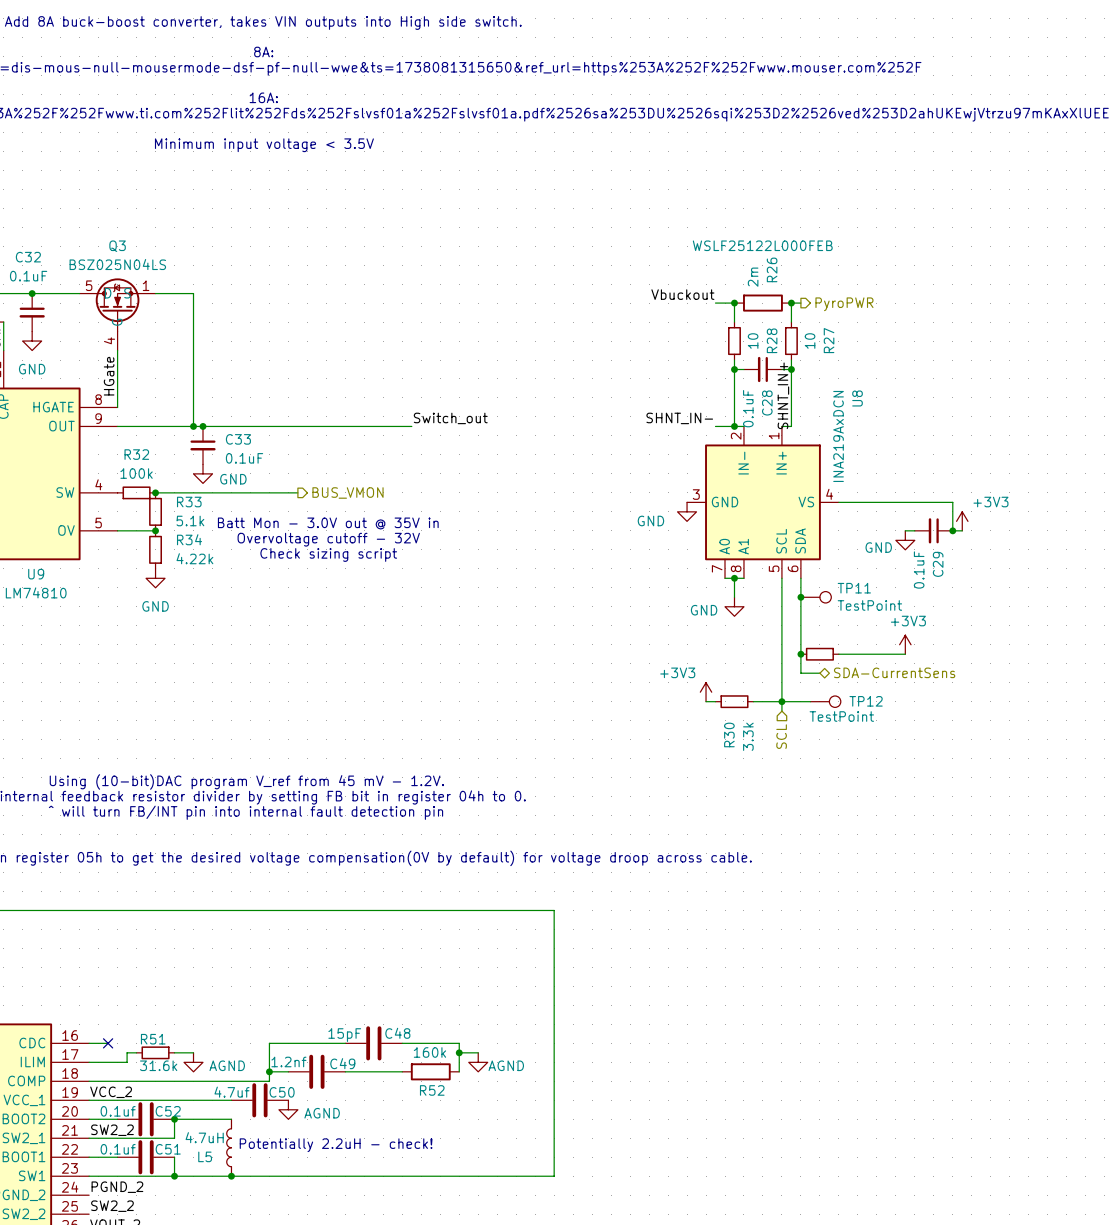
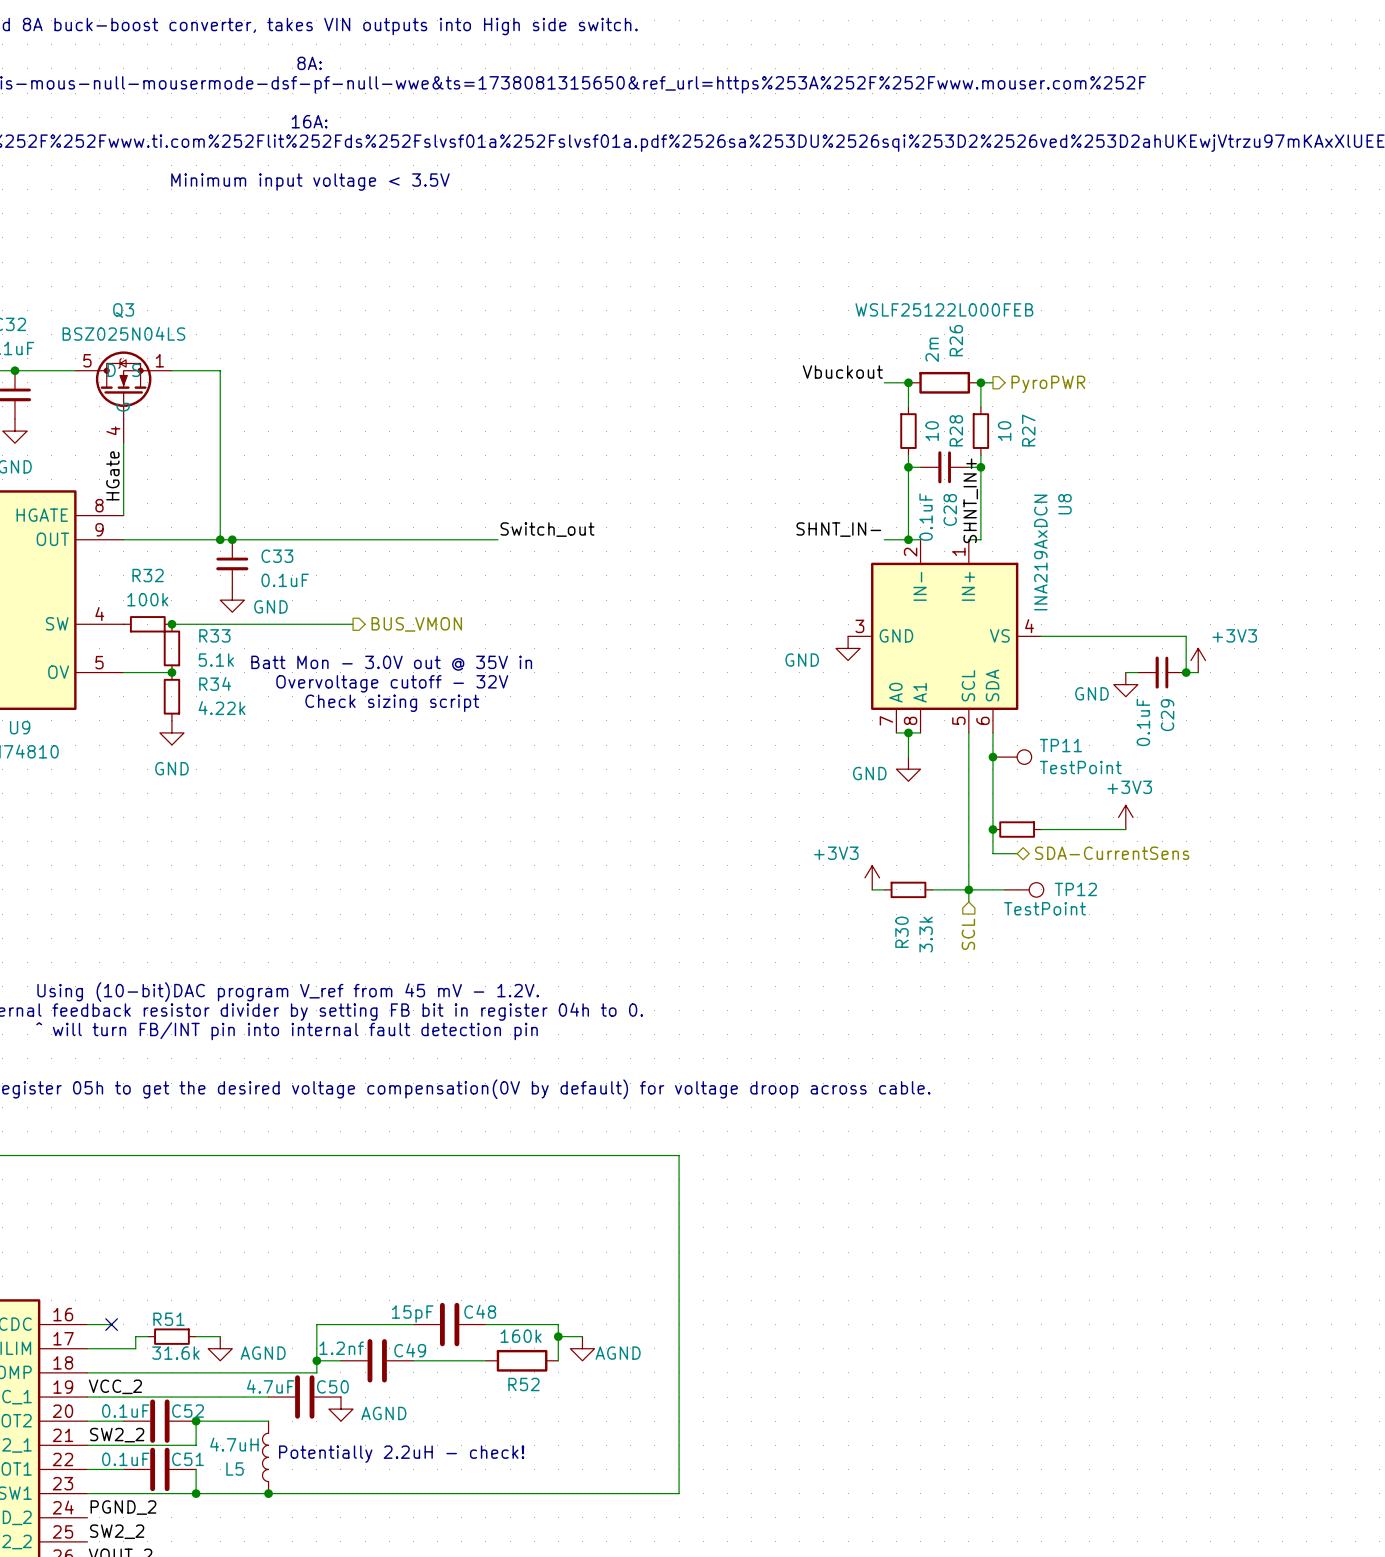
C50 value: 4.7uf (231, 1092) -> 4.7uF (270, 1386)
C52 value: 0.1uf (118, 1111) -> 0.1uF (125, 1411)
C51 value: 0.1uf (118, 1149) -> 0.1uF (125, 1459)

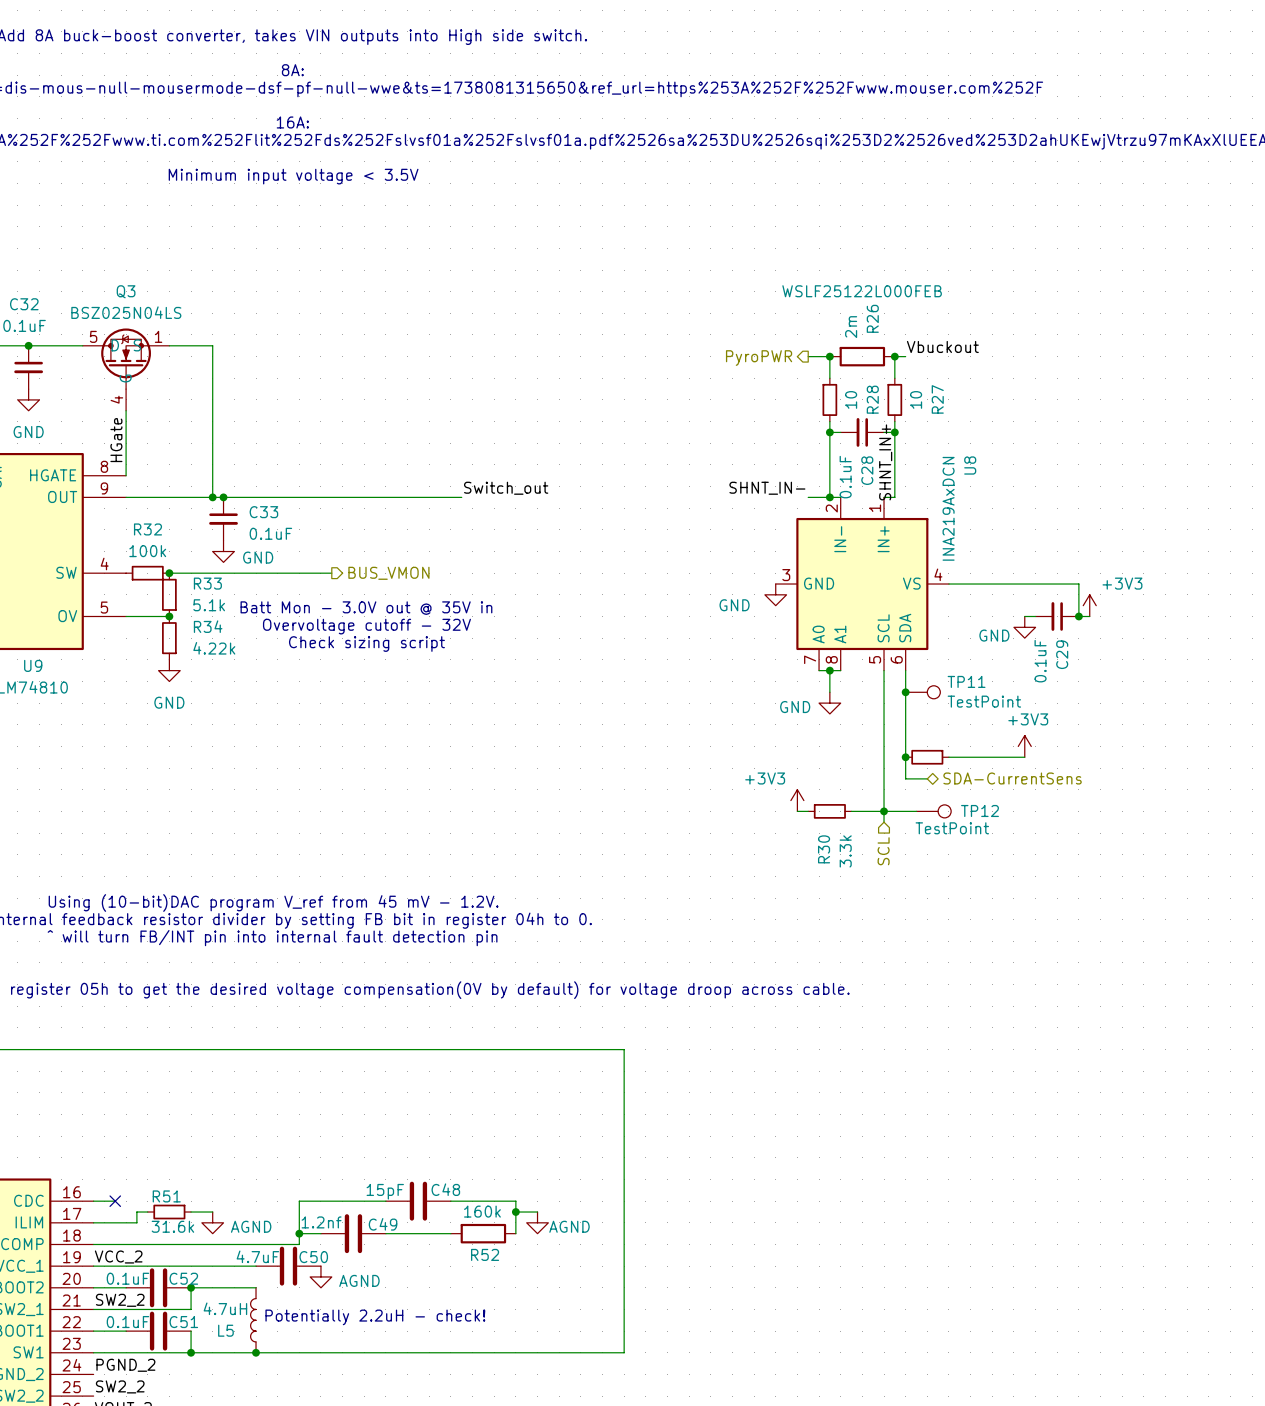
label position: Vbuckout (842, 372) -> Vbuckout (942, 346)
hierarchical label rotation: 0° (1048, 384) -> 180° (759, 358)
hierarchical label position: PyroPWR (1048, 384) -> PyroPWR (759, 358)

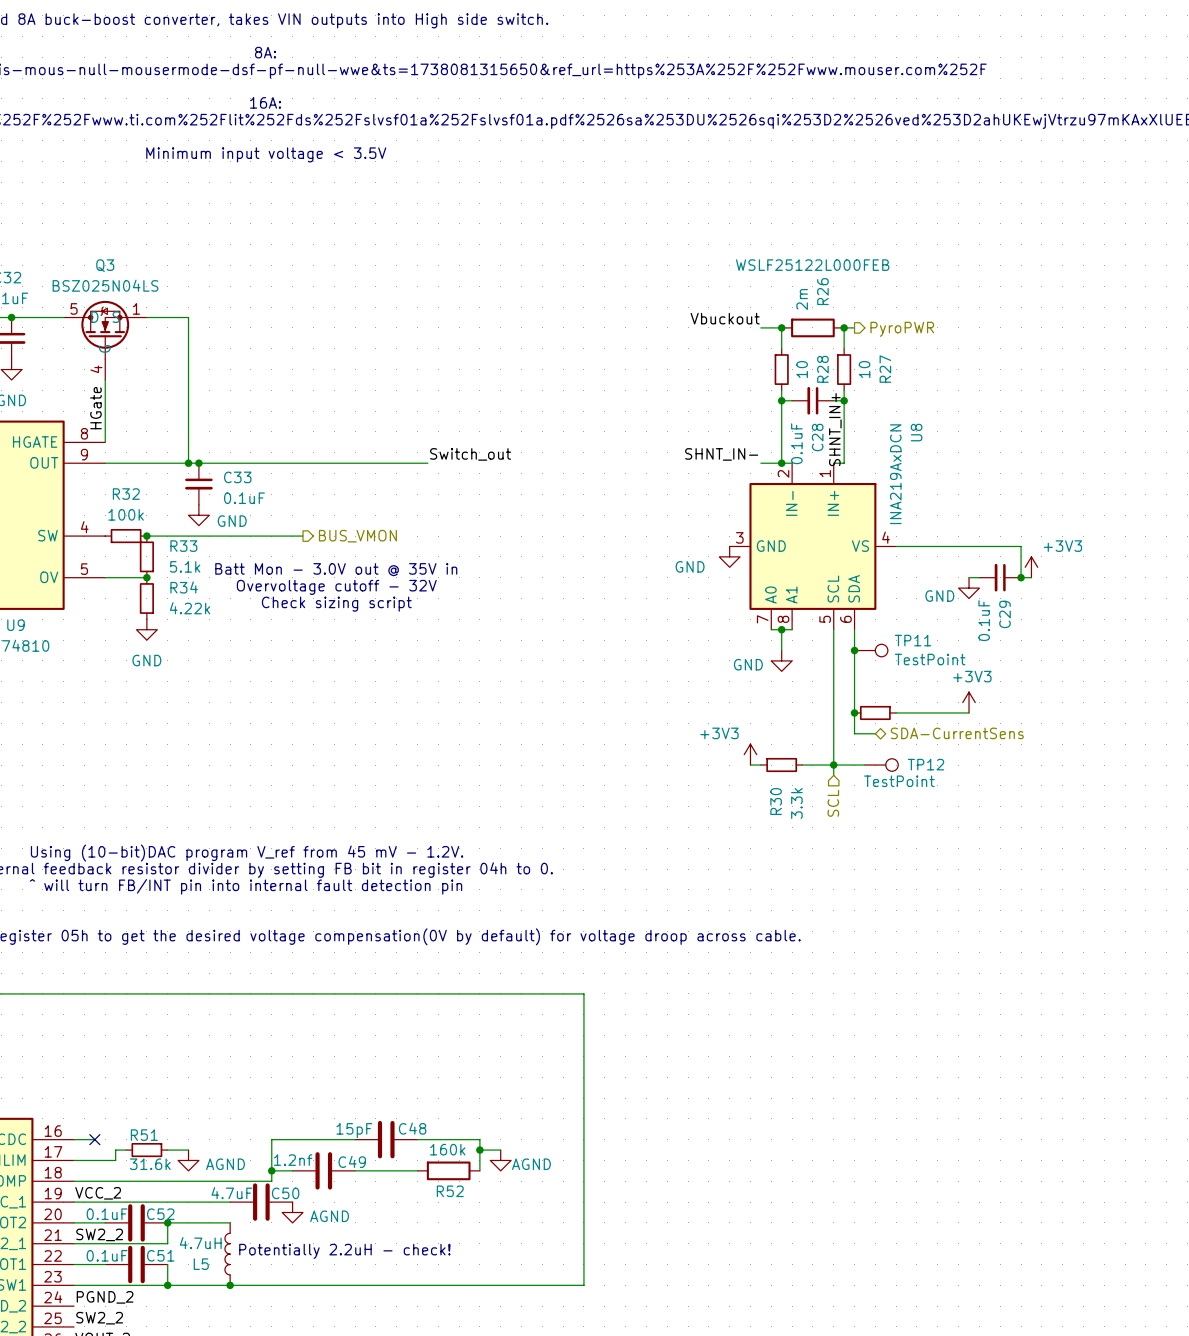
label position: Vbuckout (942, 346) -> Vbuckout (725, 318)
hierarchical label rotation: 0° (759, 358) -> 180° (902, 329)
hierarchical label position: PyroPWR (759, 358) -> PyroPWR (902, 329)

